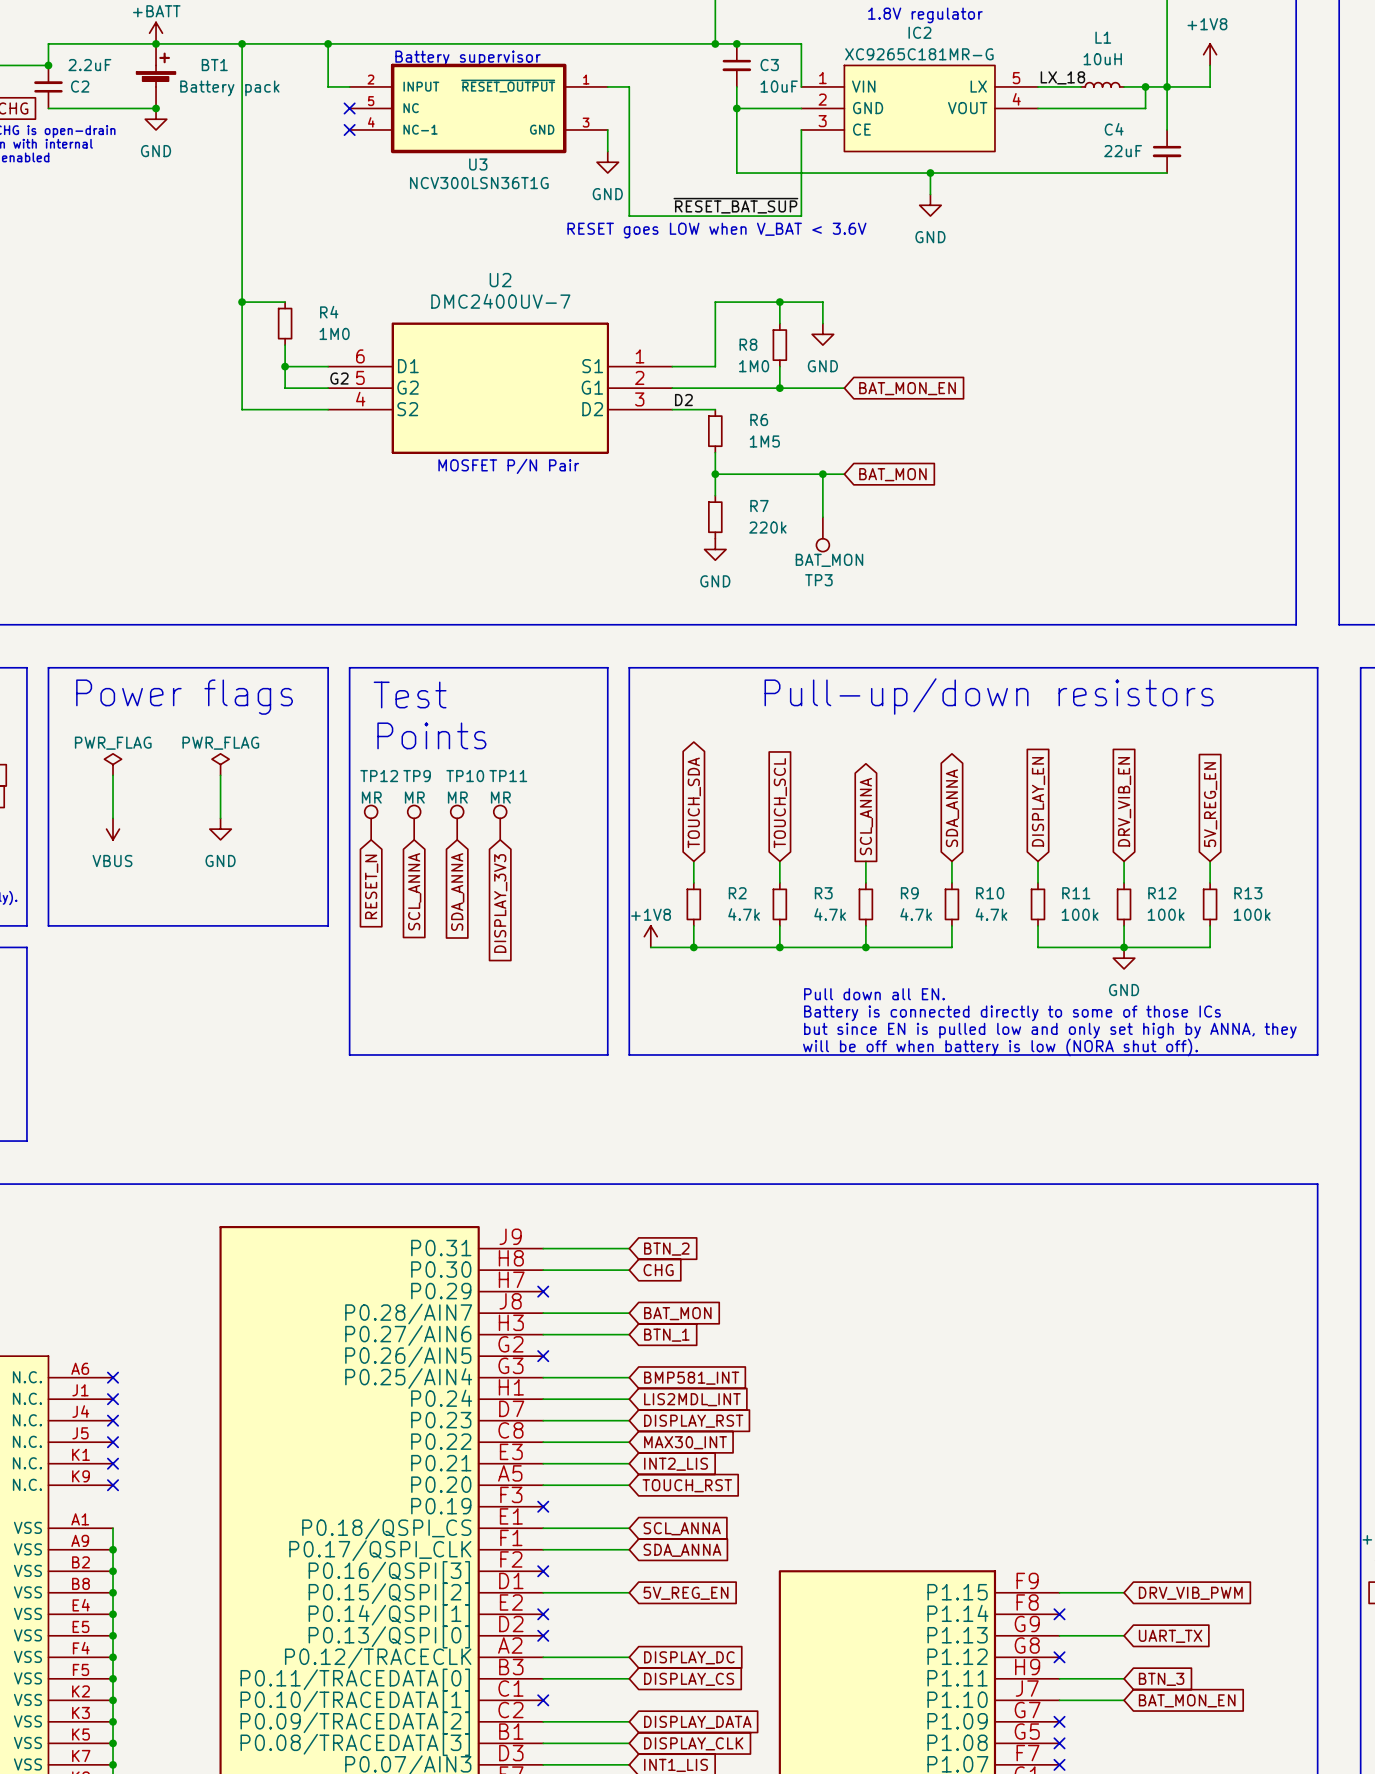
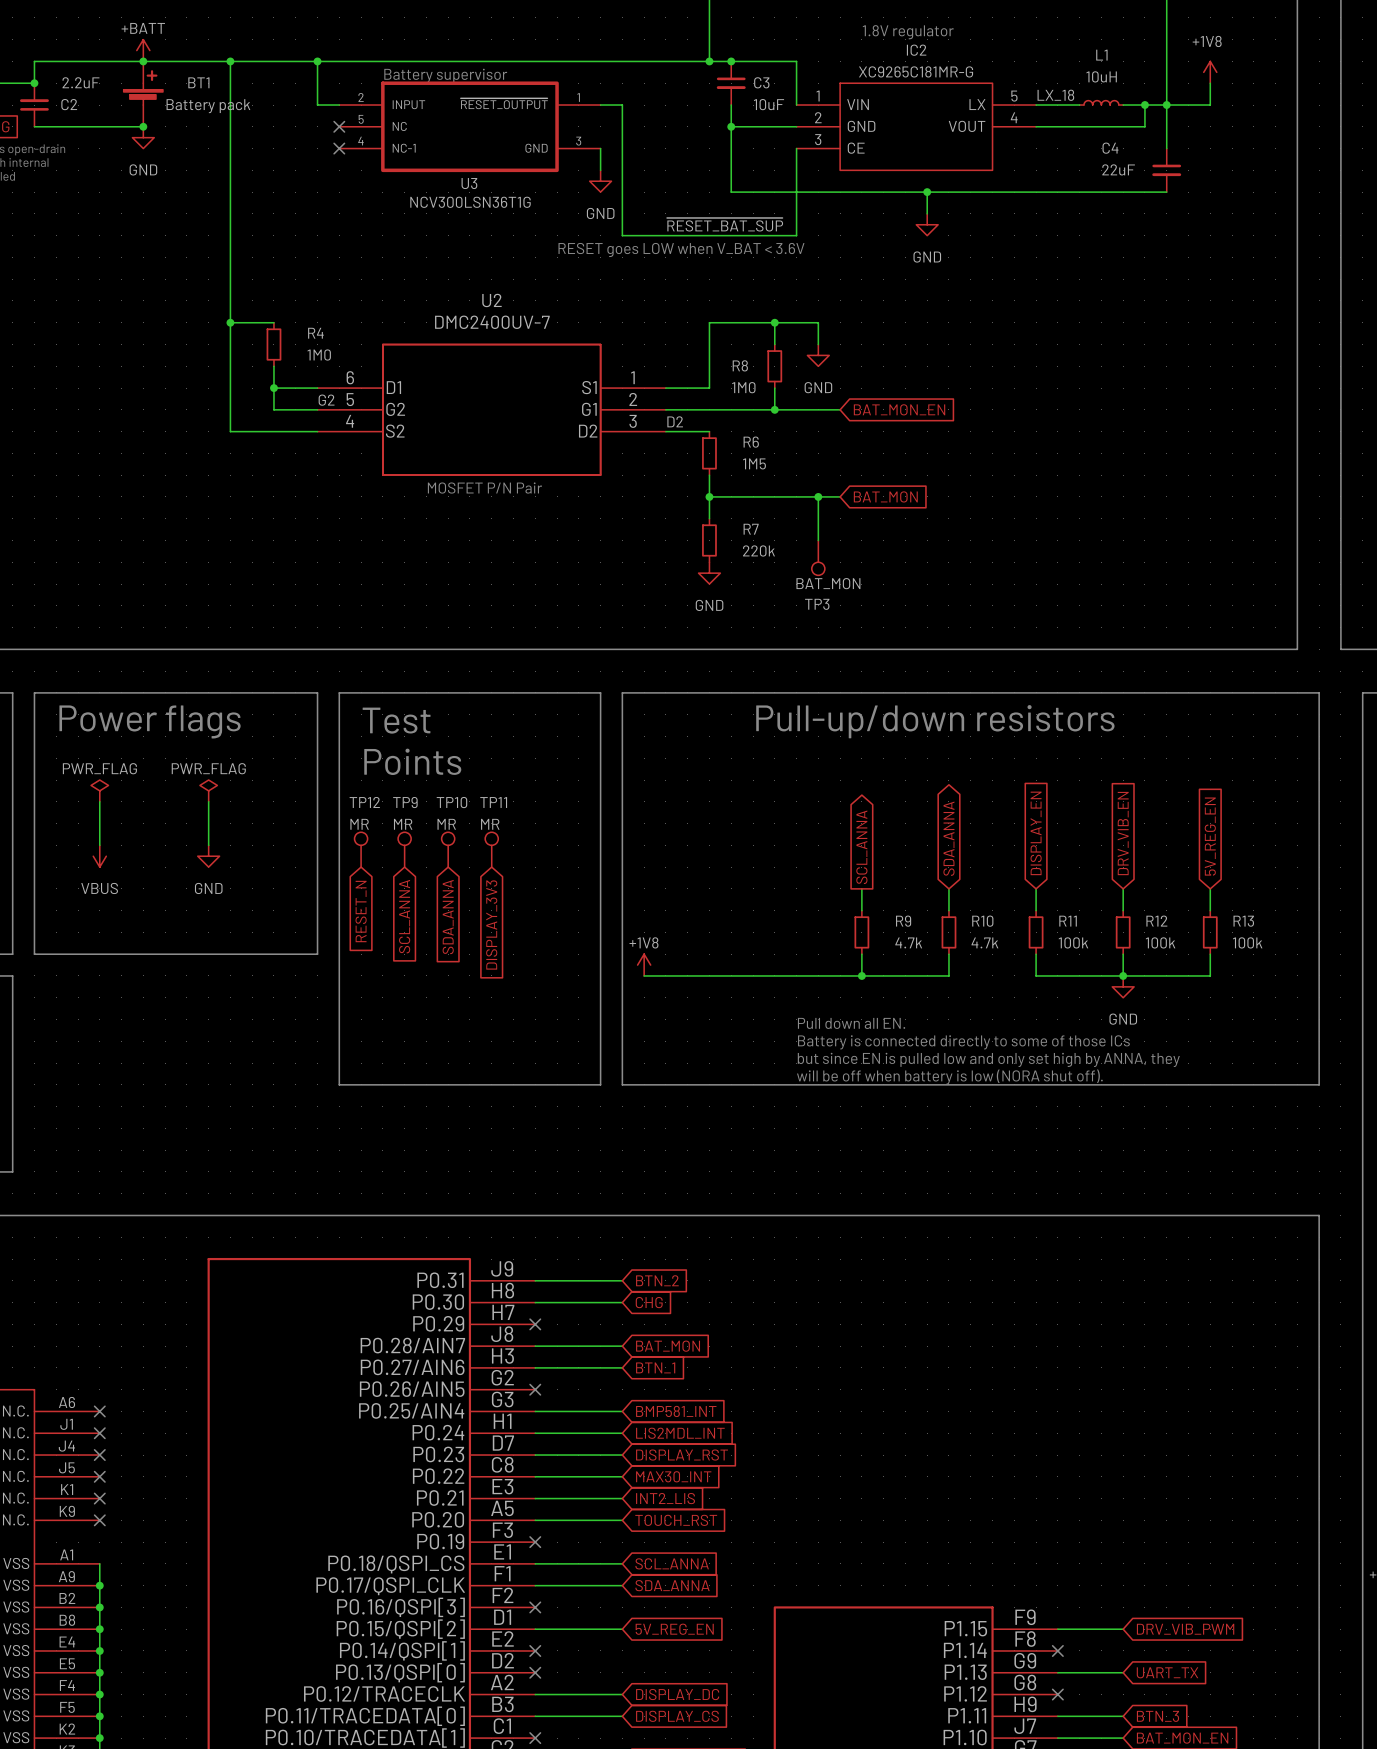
global label: TOUCH_SDA (694, 802) -> none
global label: TOUCH_SCL (780, 803) -> none
wire: (693, 861) (693, 882) -> none
wire: (779, 861) (779, 882) -> none
R2: 4.7k (693, 904) -> none
R3: 4.7k (779, 904) -> none
wire: (693, 925) (693, 947) -> none
wire: (779, 925) (779, 947) -> none
junction: (693, 947) -> none
junction: (779, 947) -> none

